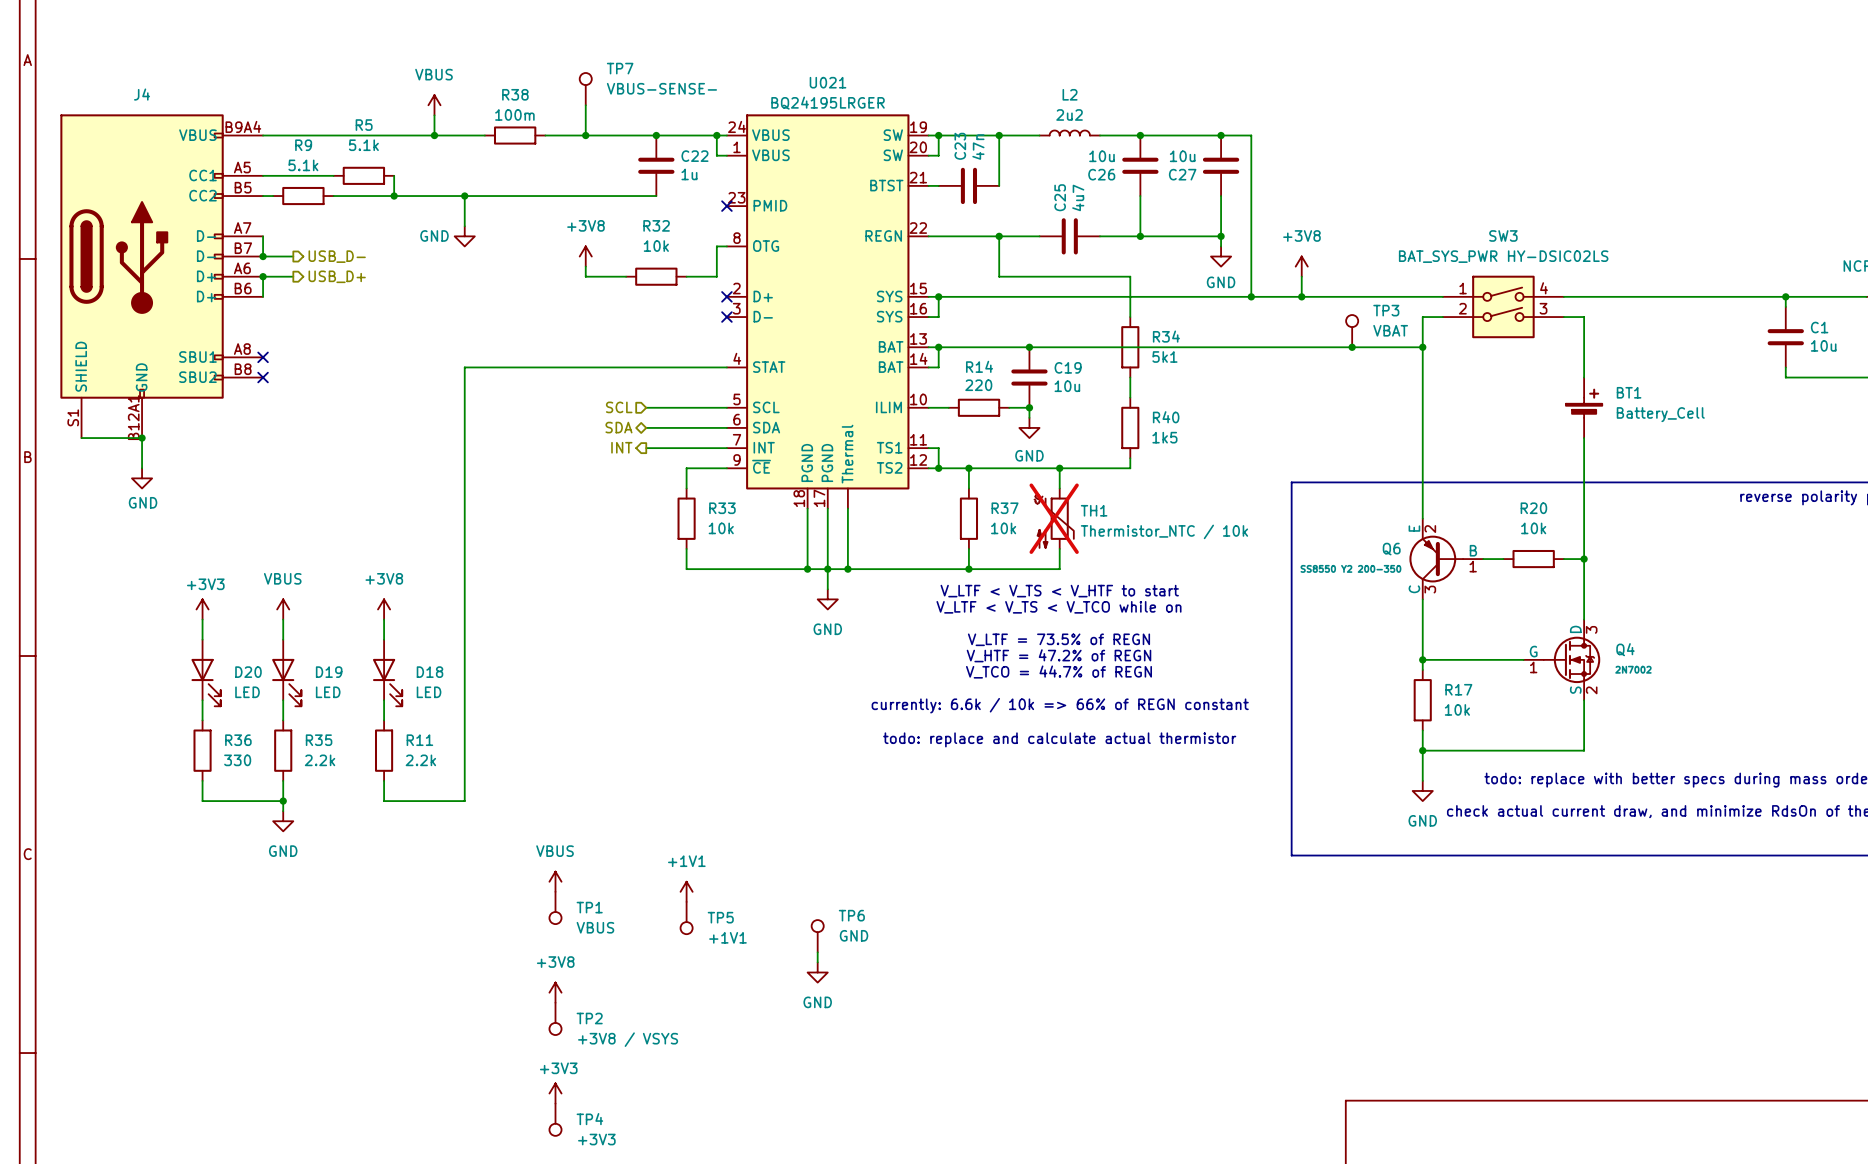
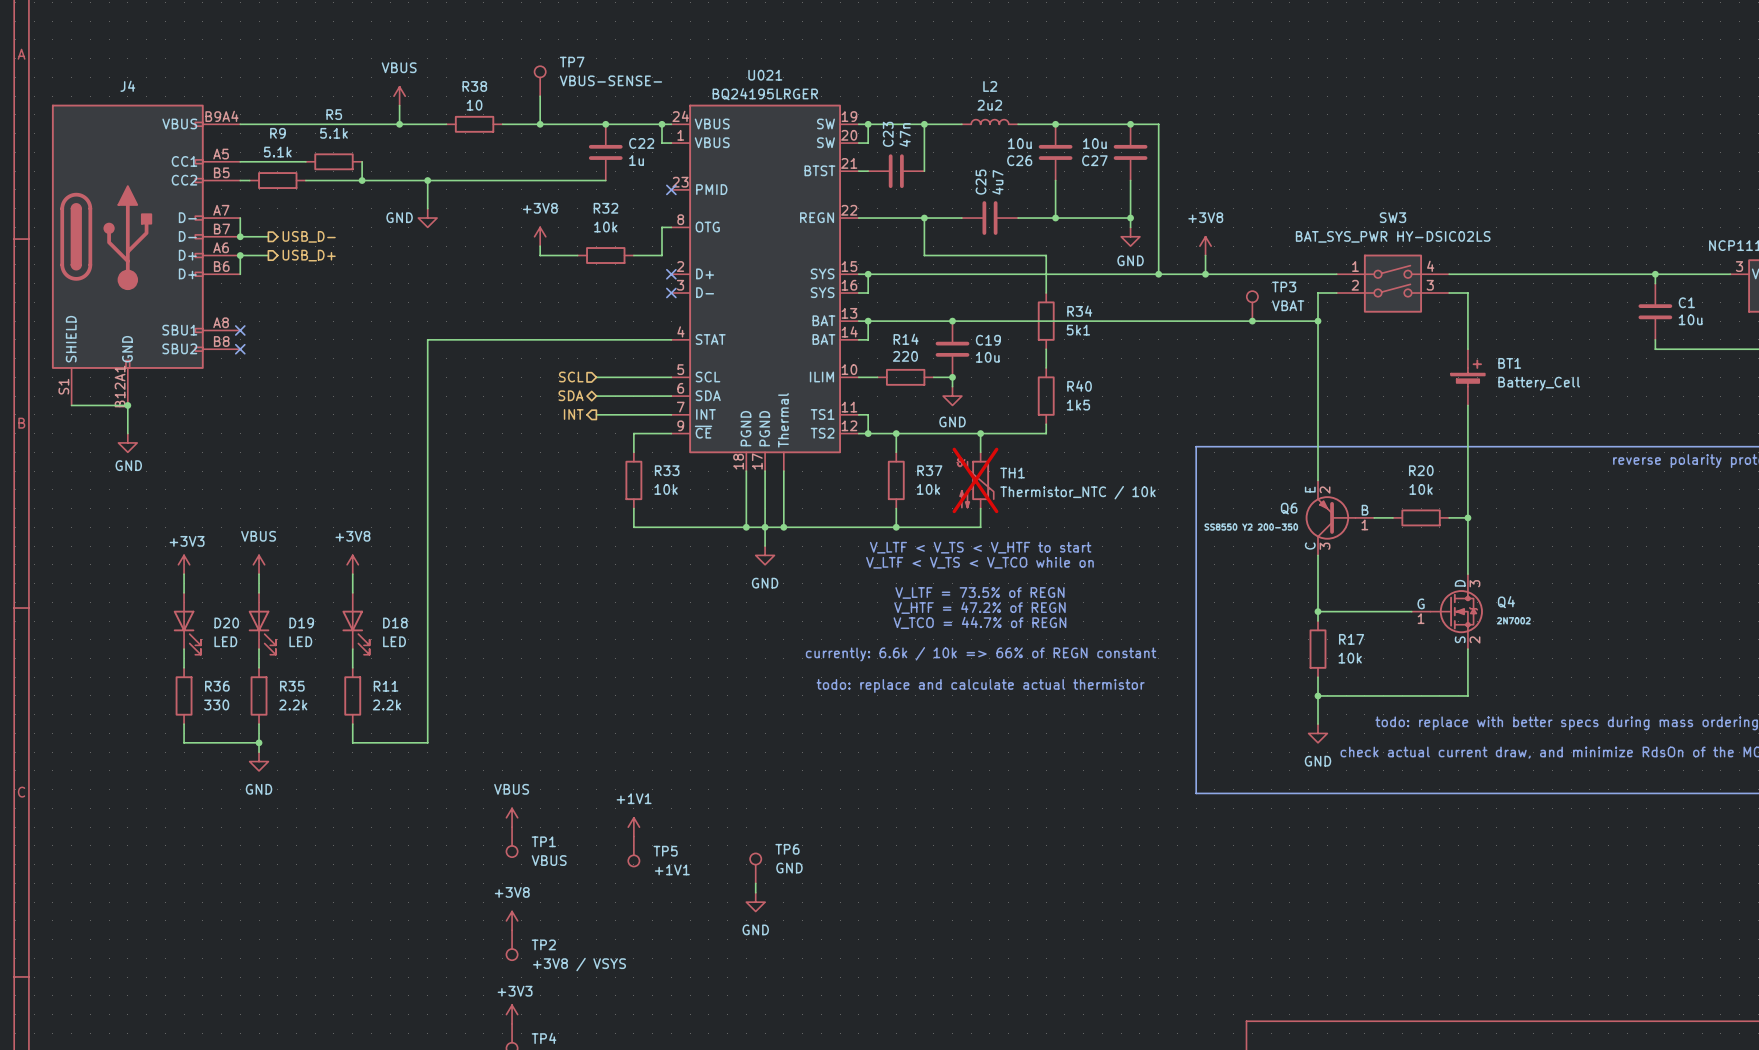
R38 value: 100m (514, 114) -> 10 (474, 105)

